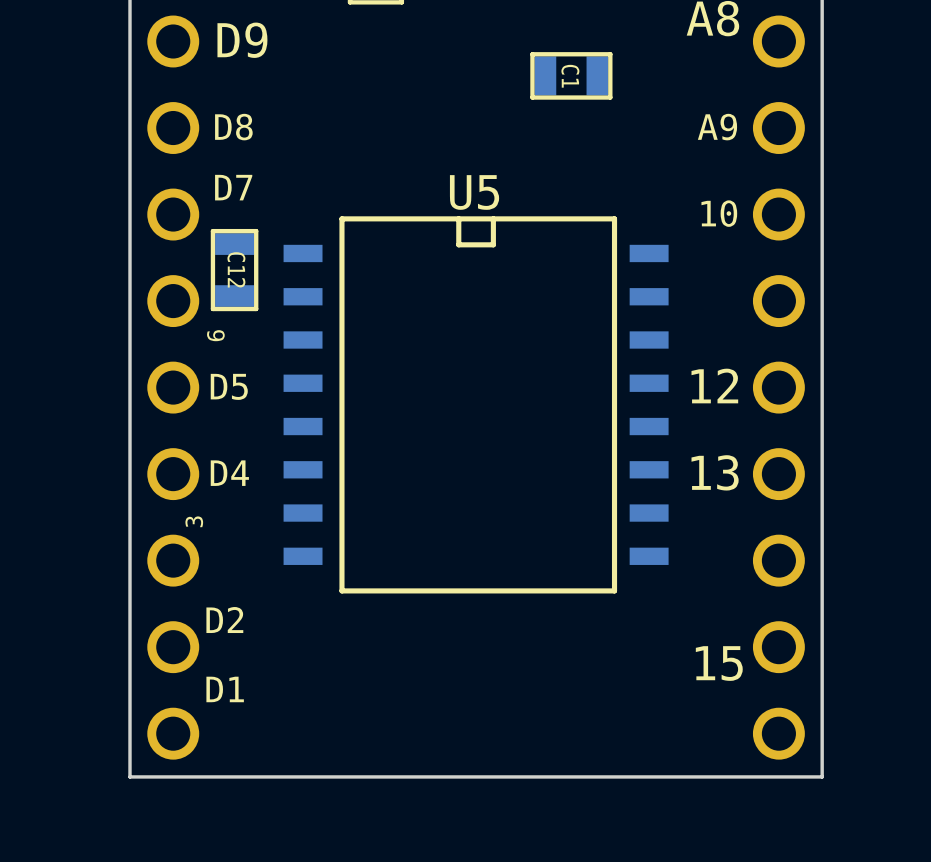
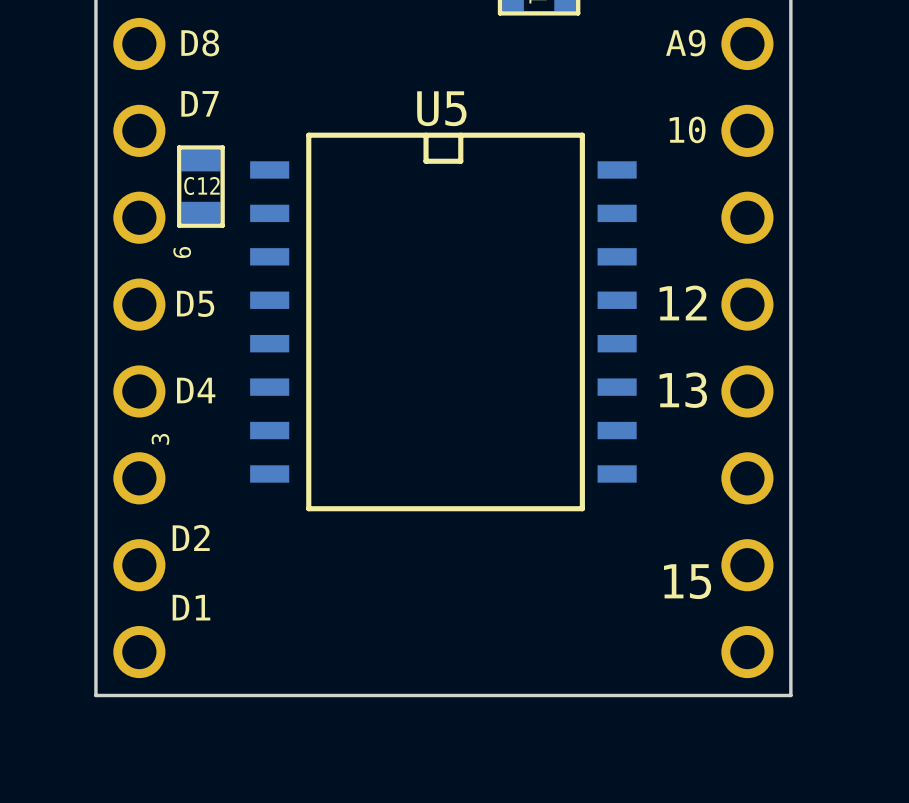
C12 name rotation: 0° (236, 269) -> 90° counterclockwise (201, 185)

